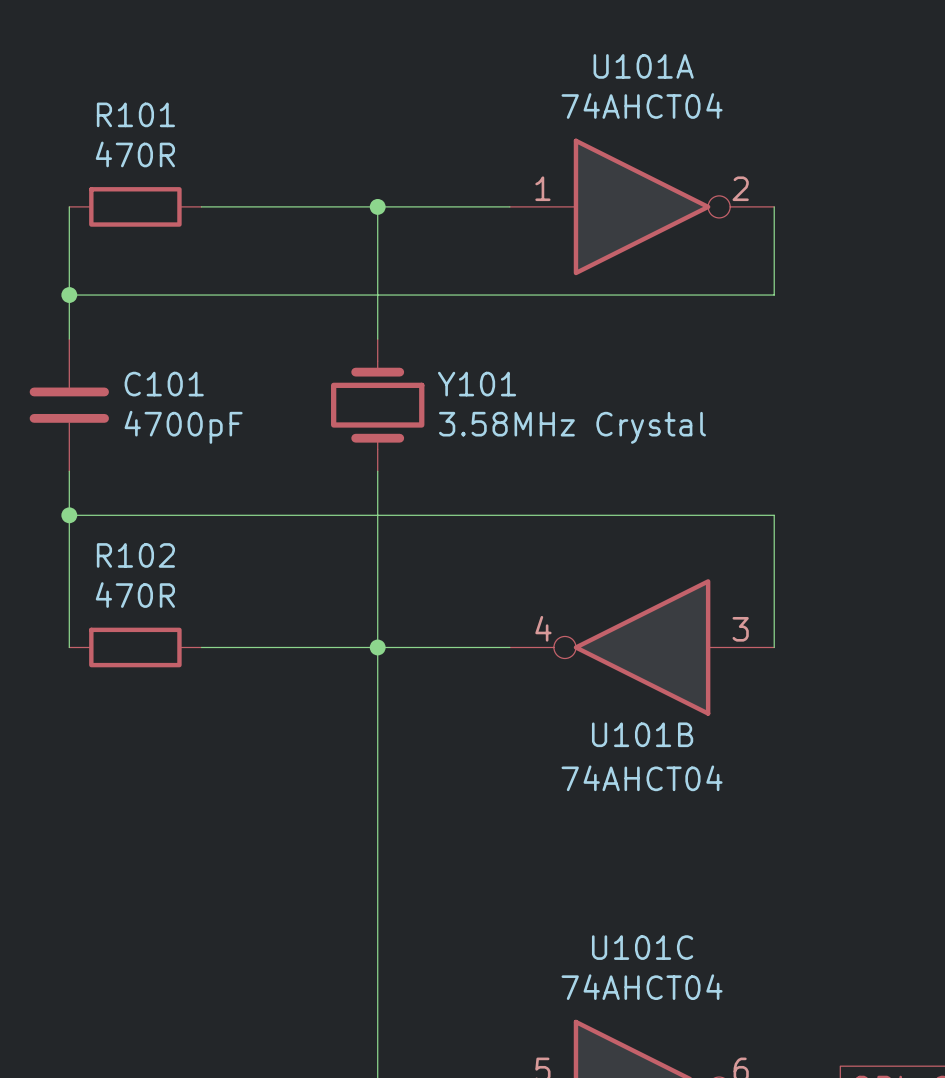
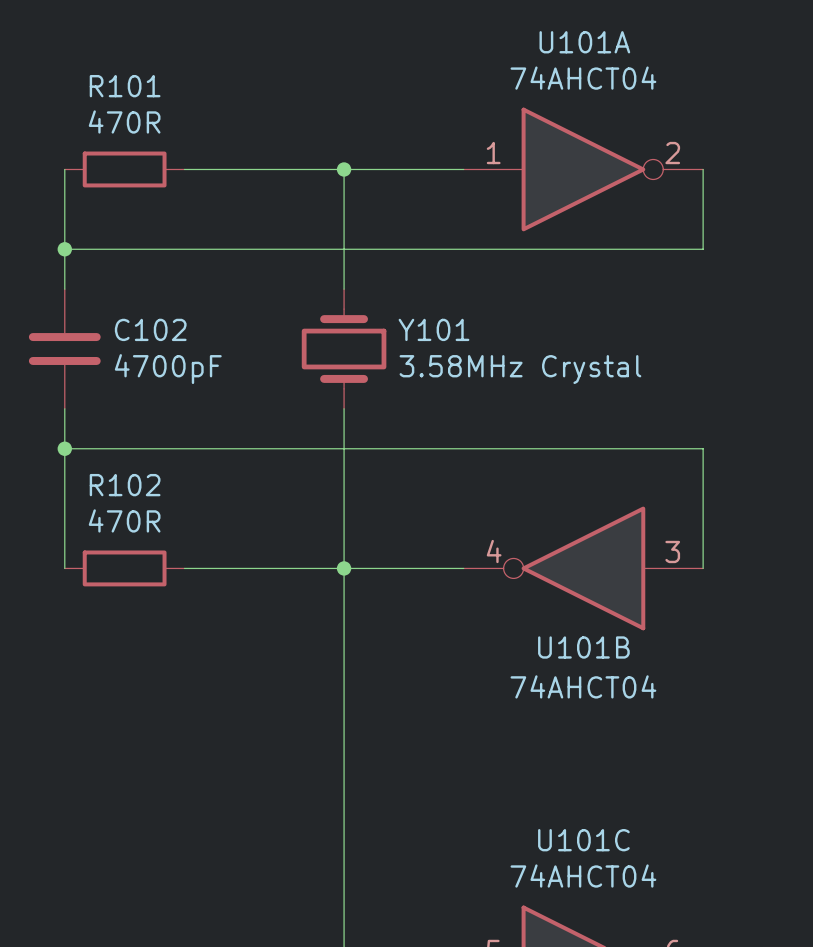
C101 name: C101 (164, 384) -> C102 (150, 329)

